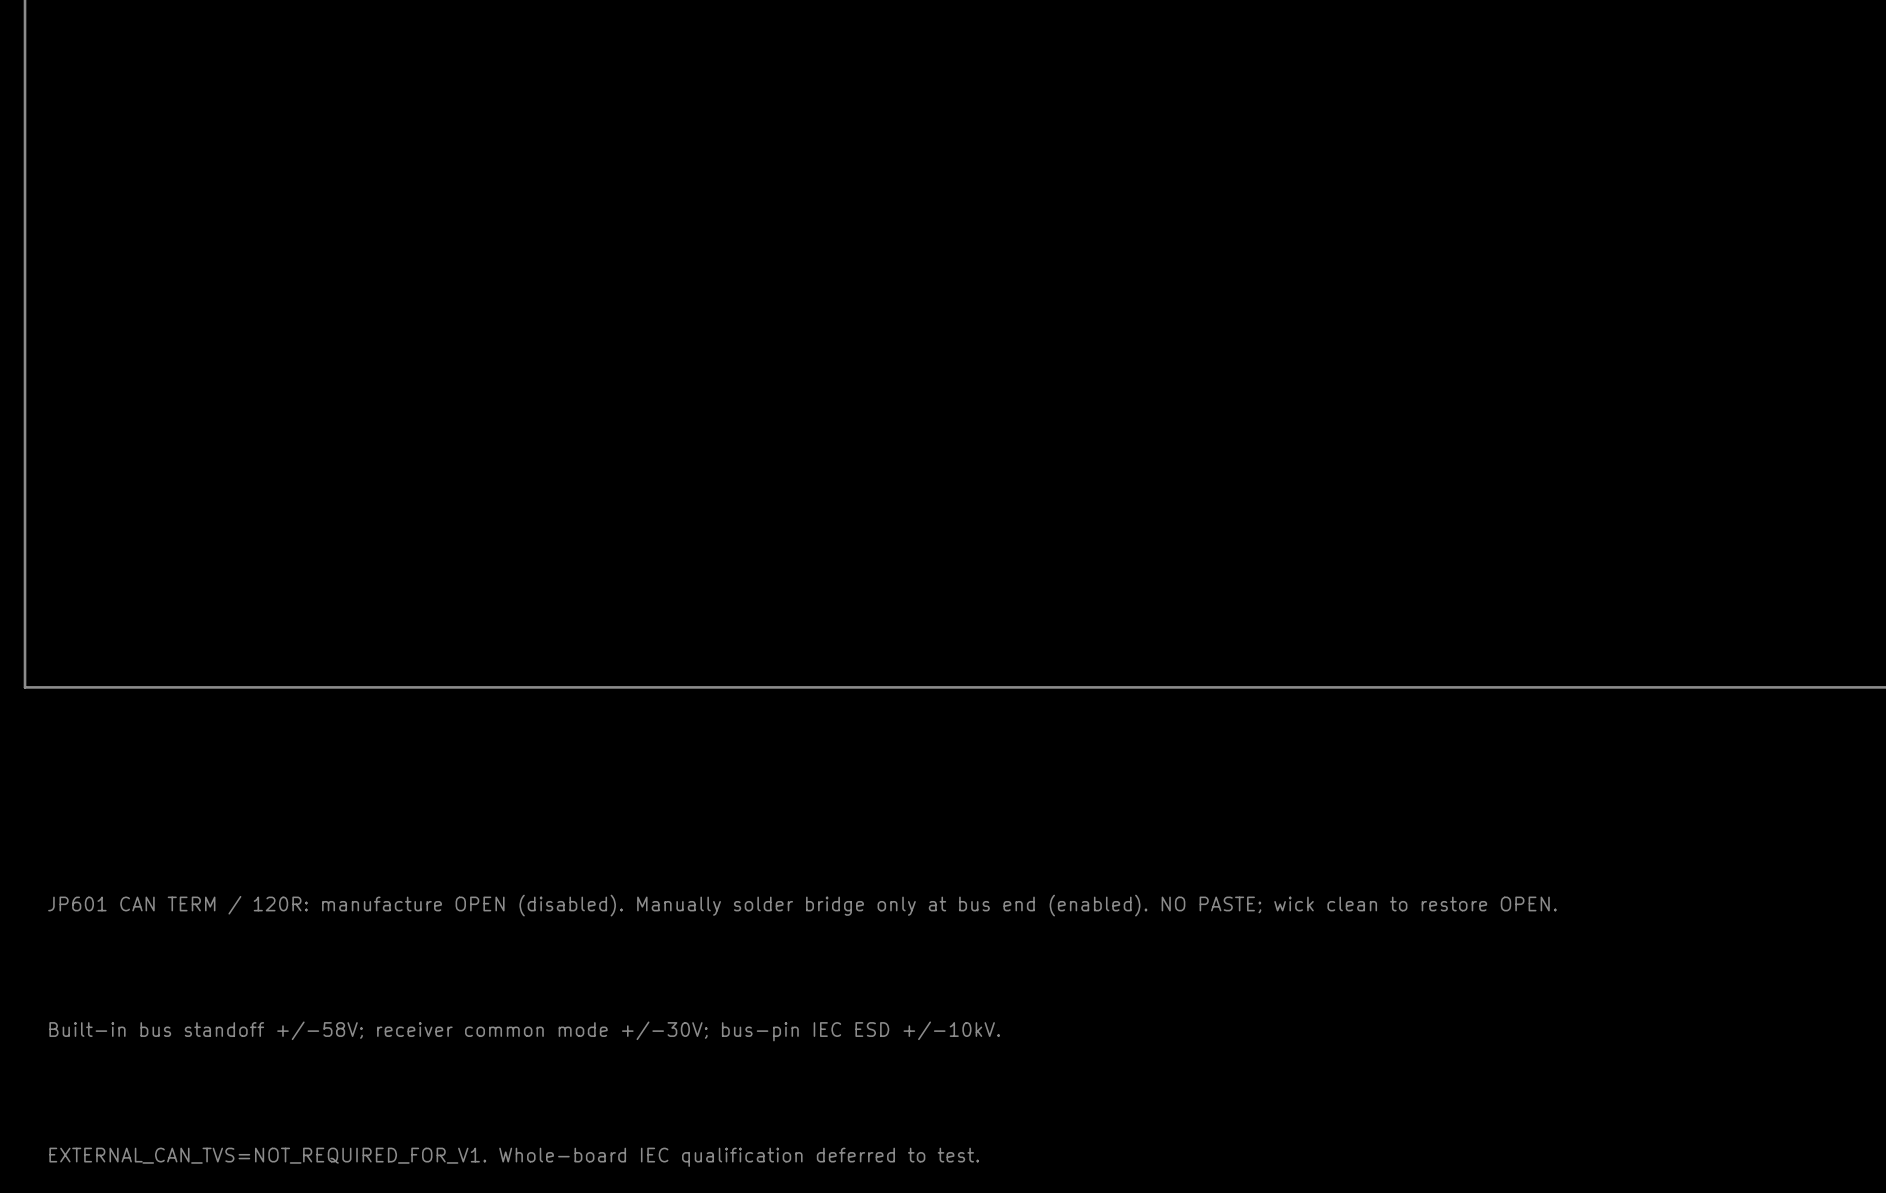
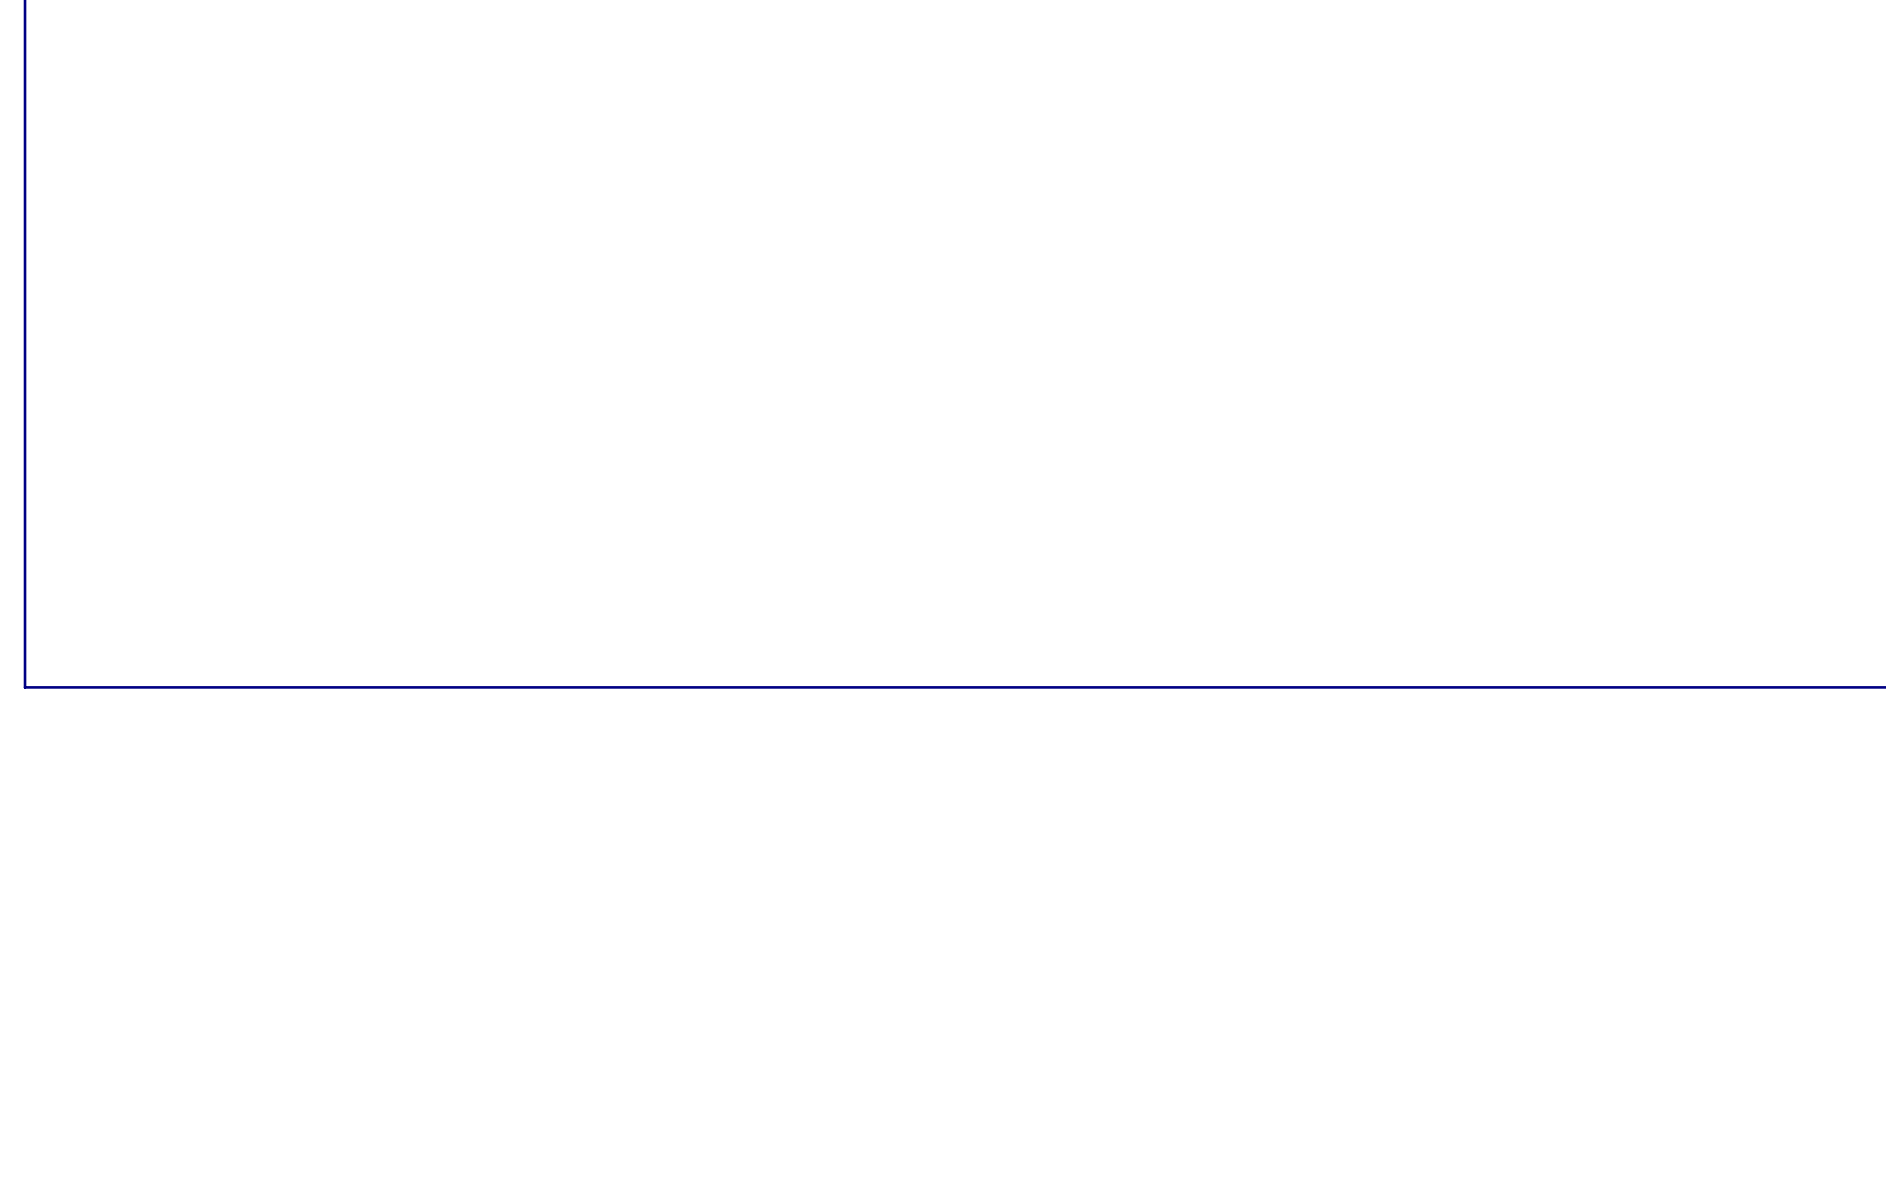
text: JP601 CAN TERM / 120R: manufacture OPEN (disabled). Manually solder bridge only at bus end (enabled). NO PASTE; wick clean to restore OPEN. (802, 905) -> none
text: Built-in bus standoff +/-58V; receiver common mode +/-30V; bus-pin IEC ESD +/-10kV. (524, 1031) -> none
text: EXTERNAL_CAN_TVS=NOT_REQUIRED_FOR_V1. Whole-board IEC qualification deferred to test. (514, 1157) -> none

